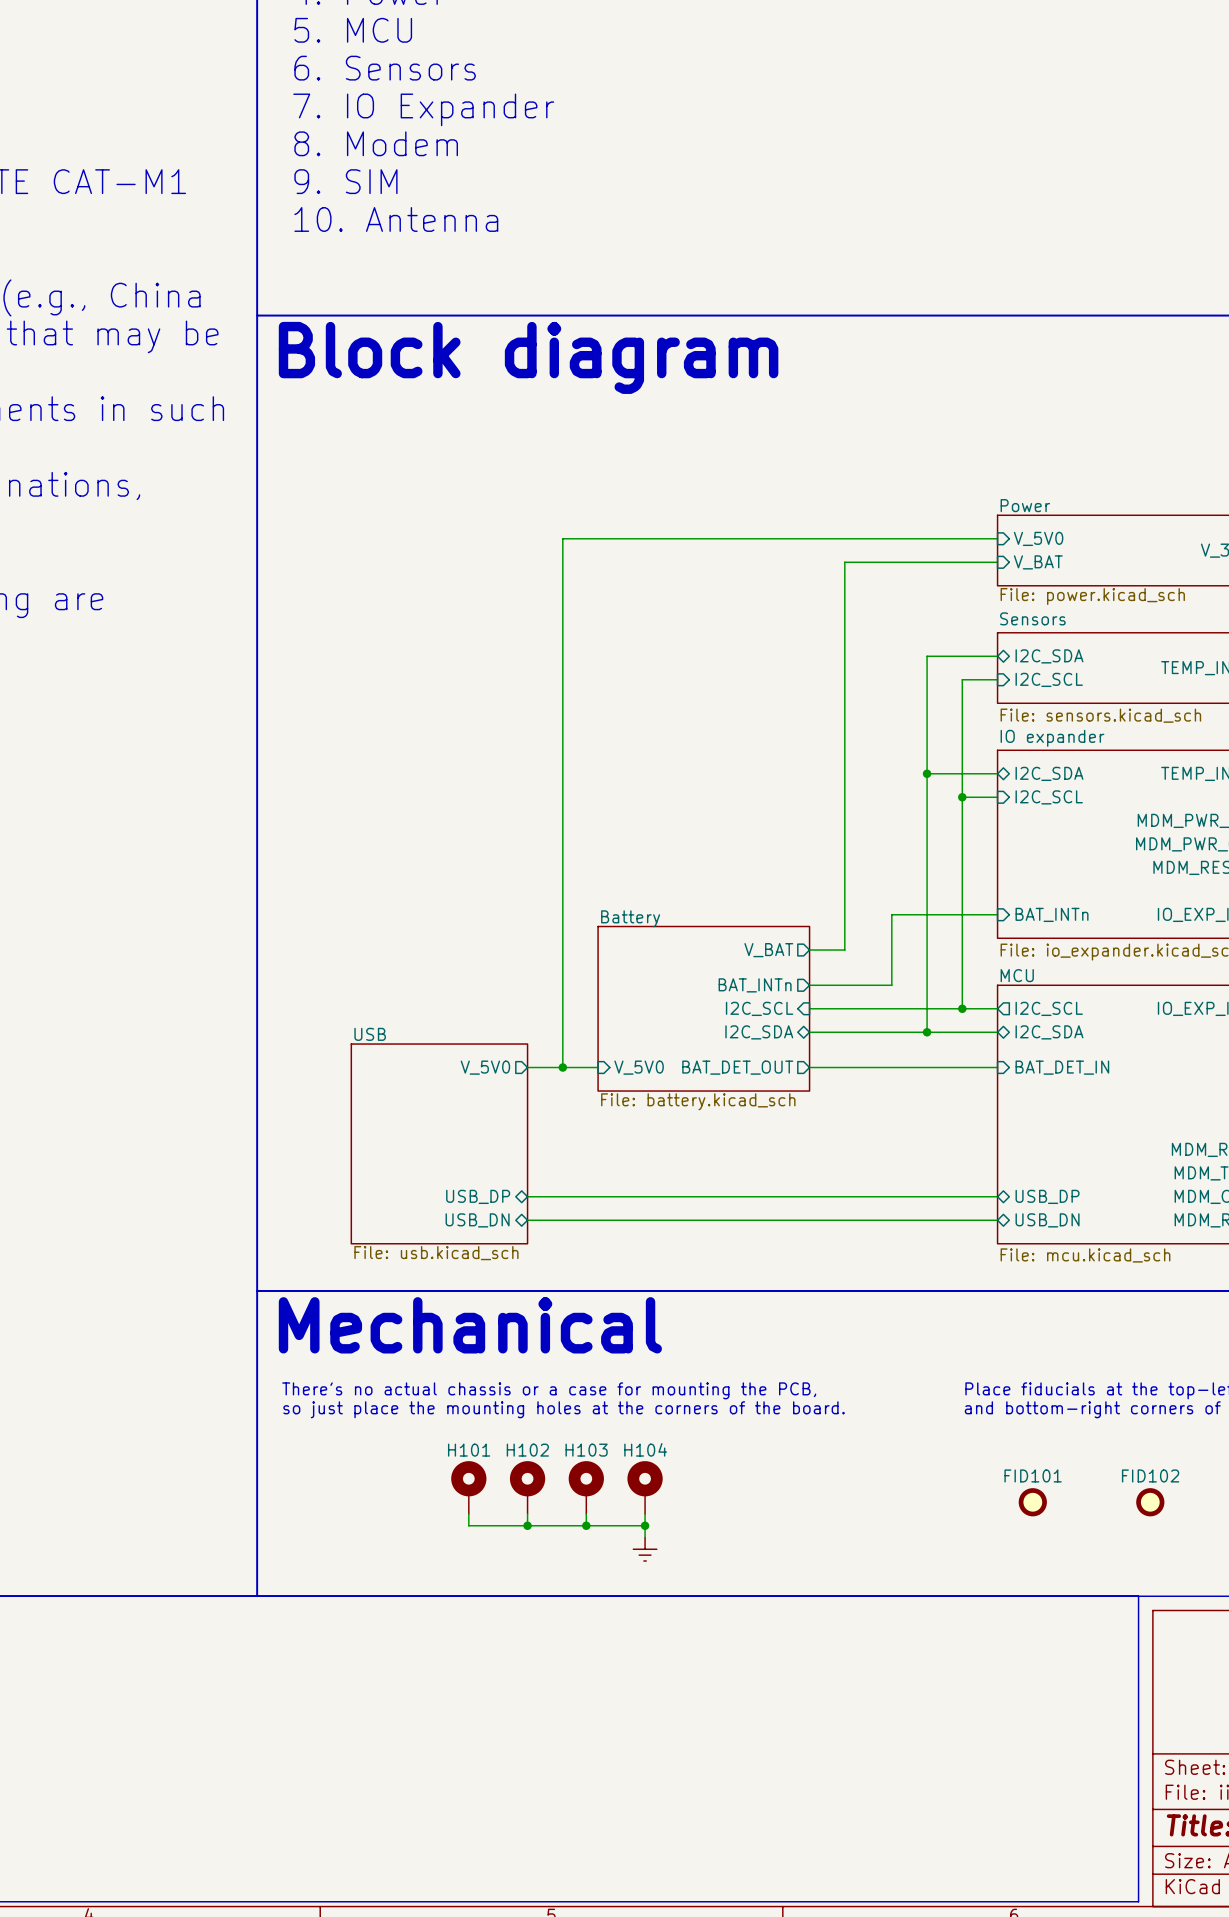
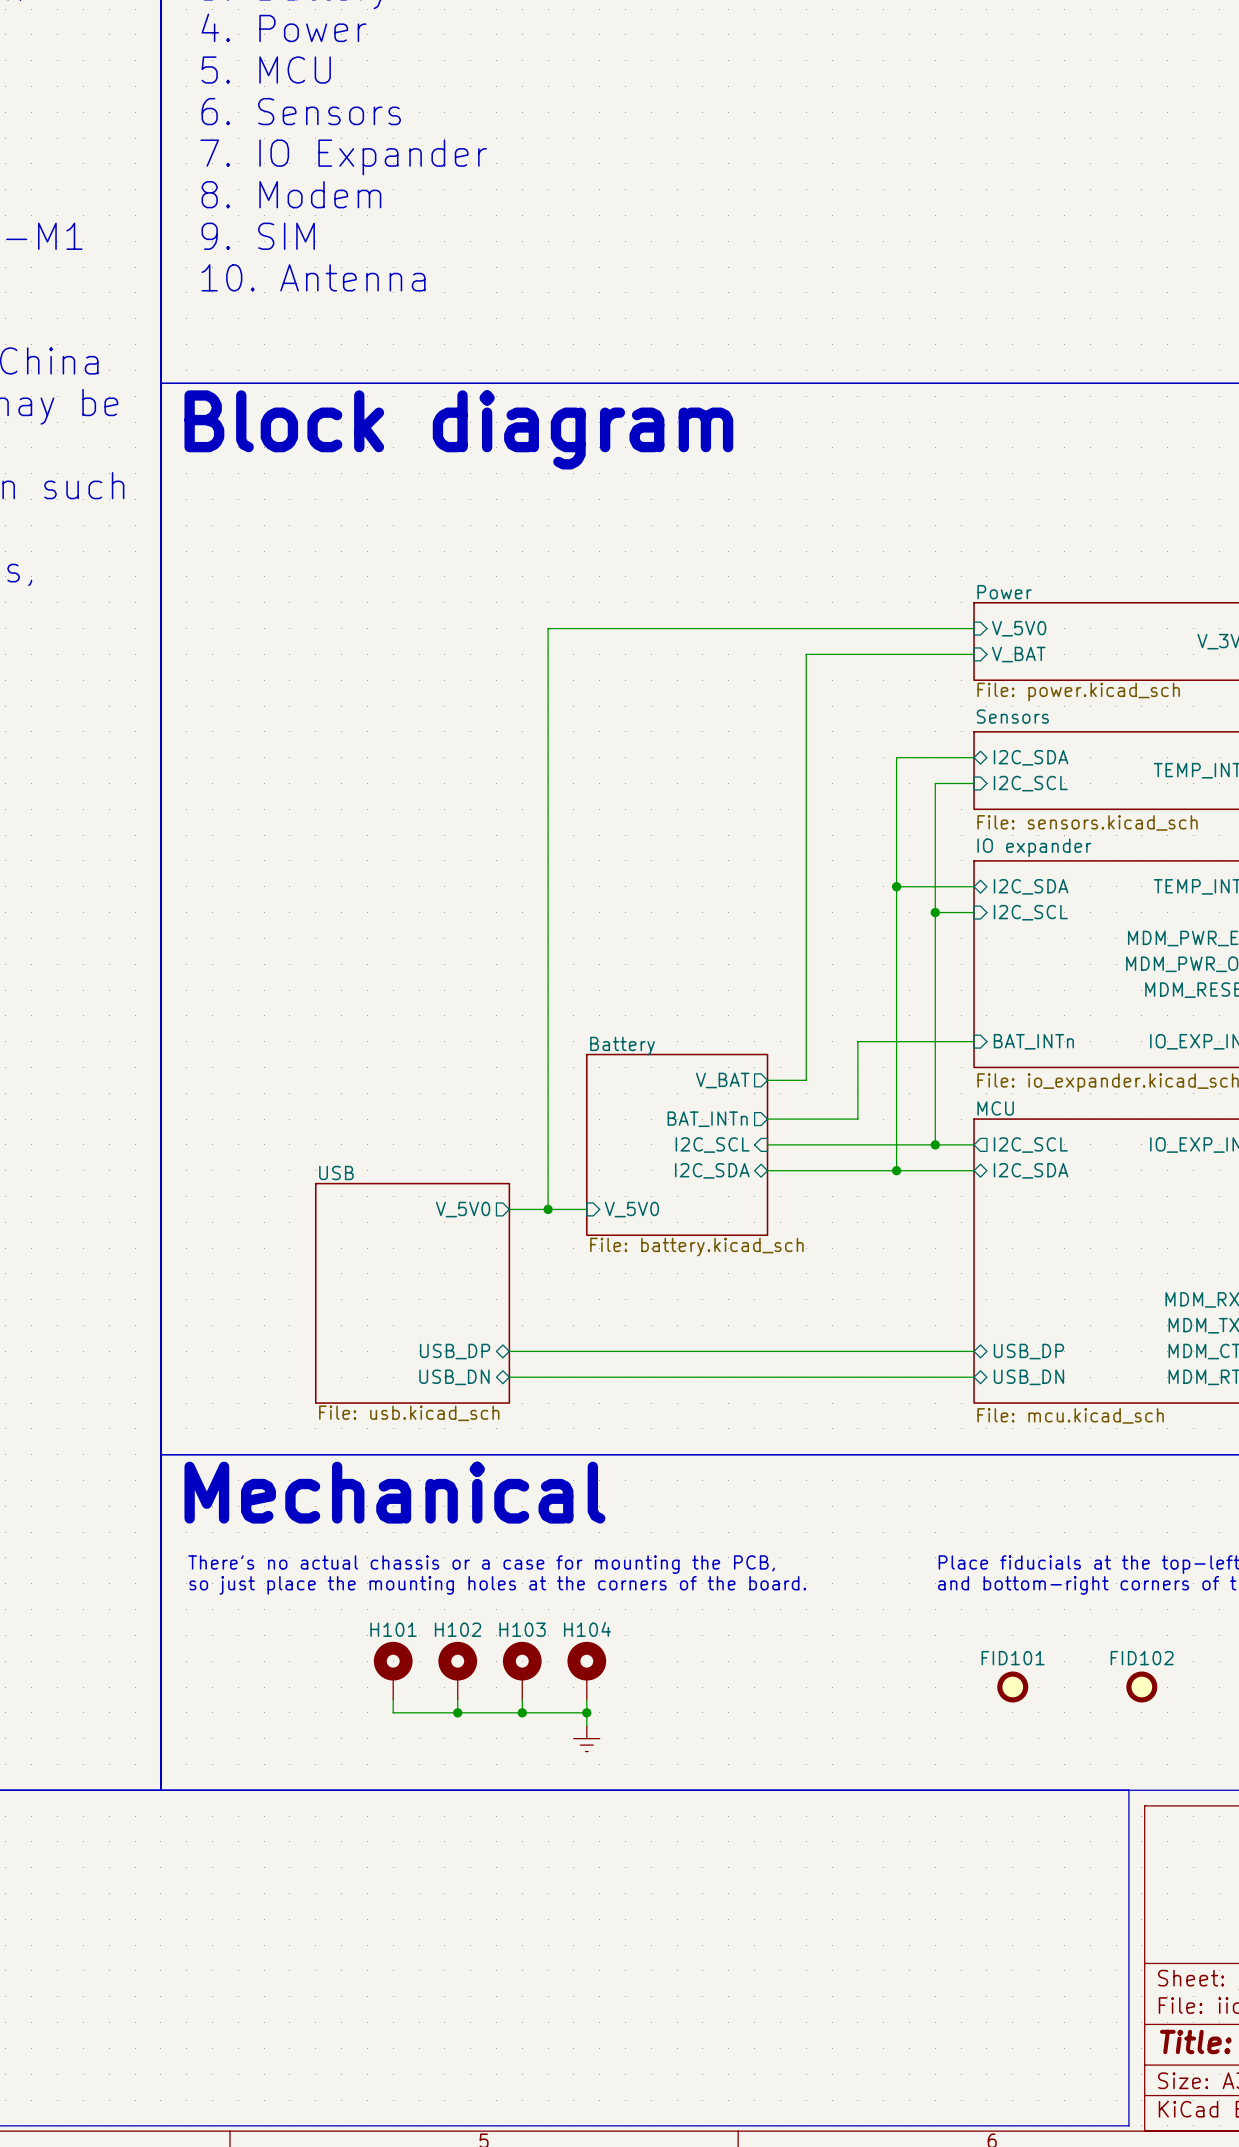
wire: (609, 538) (562, 538) (562, 1067) -> (548, 628) (548, 1209)
sheet Battery: File: battery.kicad_sch (703, 1008) -> none
sheet Battery: none -> File: battery.kicad_sch (677, 1144)
sheet pin position: V_5V0 (485, 1067) -> V_5V0 (463, 1209)
wire: (527, 1067) (574, 1067) -> (535, 1209) (586, 1209)
junction position: (562, 1067) -> (548, 1209)
sheet pin position: V_5V0 (639, 1067) -> V_5V0 (631, 1209)
sheet pin: BAT_DET_OUT (737, 1067) -> none
wire: (809, 1067) (997, 1067) -> none
sheet pin: BAT_DET_IN (1062, 1067) -> none
sheet USB position: (439, 1143) -> (412, 1293)
sheet pin position: USB_DP (478, 1196) -> USB_DP (455, 1351)
wire: (527, 1196) (574, 1196) -> none
sheet pin position: USB_DN (477, 1220) -> USB_DN (454, 1377)
wire: (527, 1220) (574, 1220) -> none

